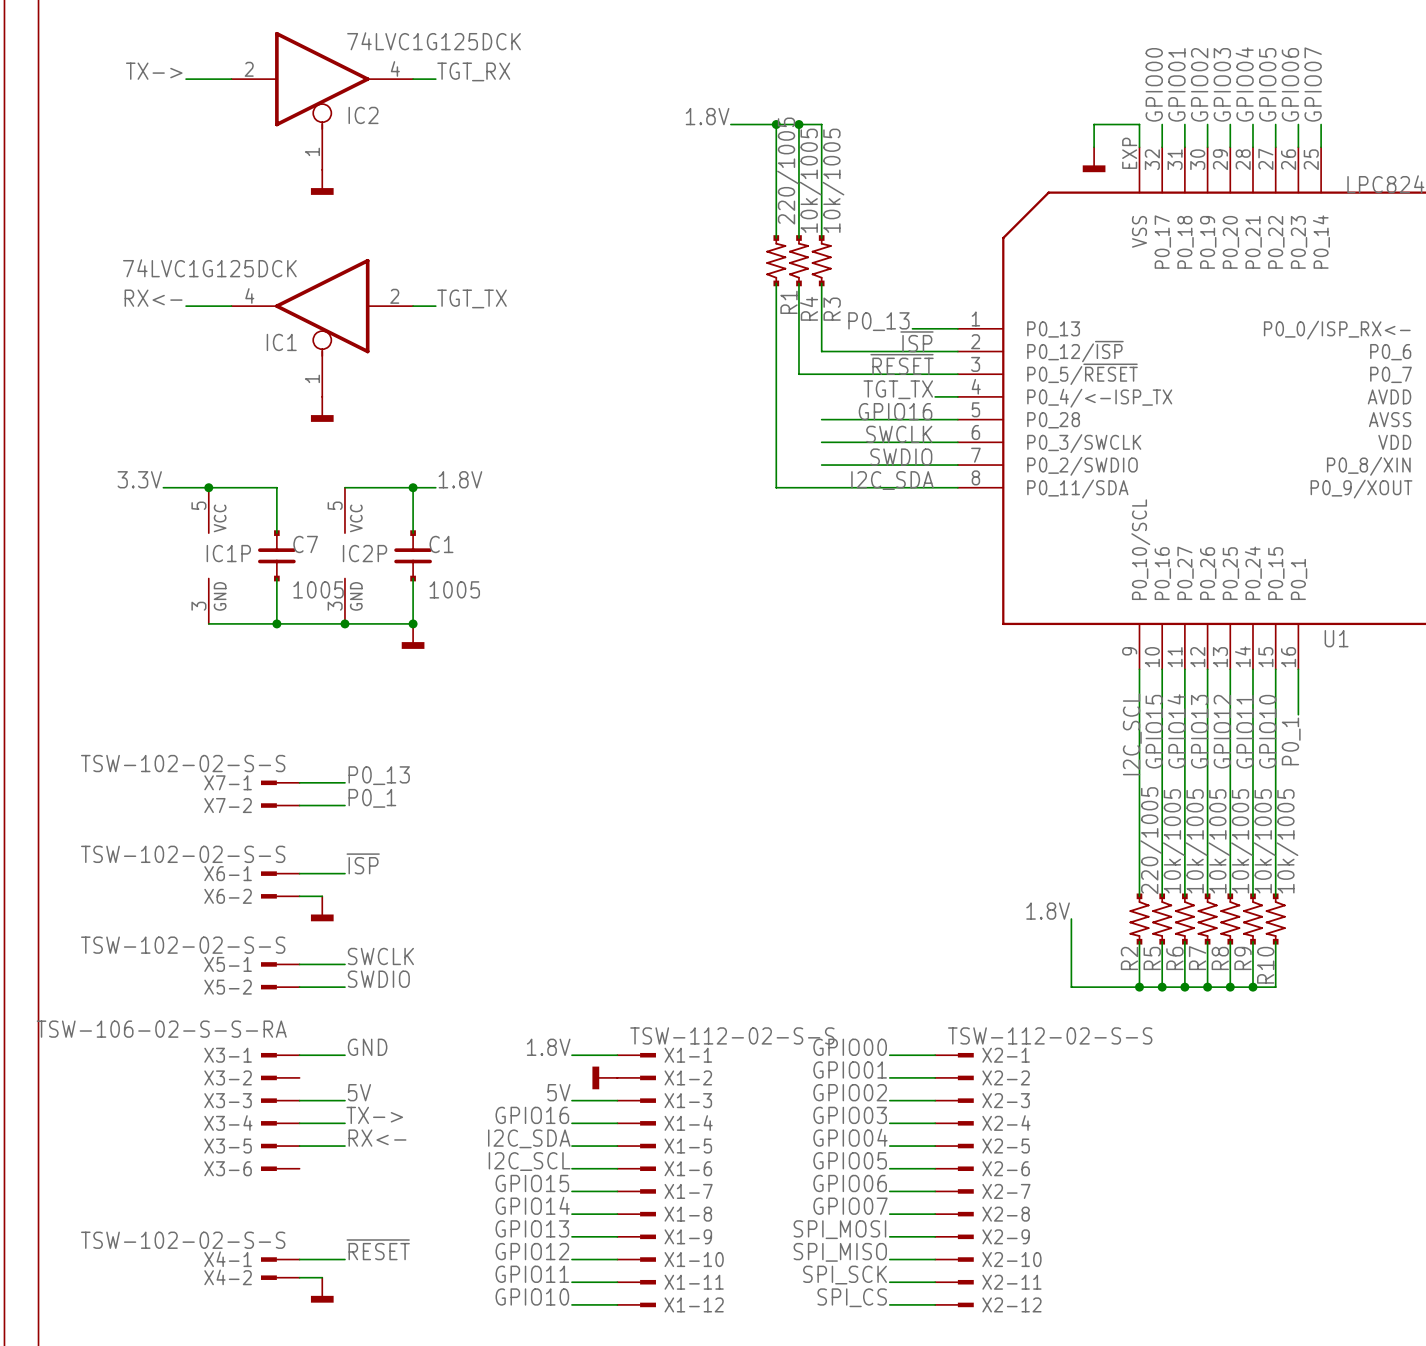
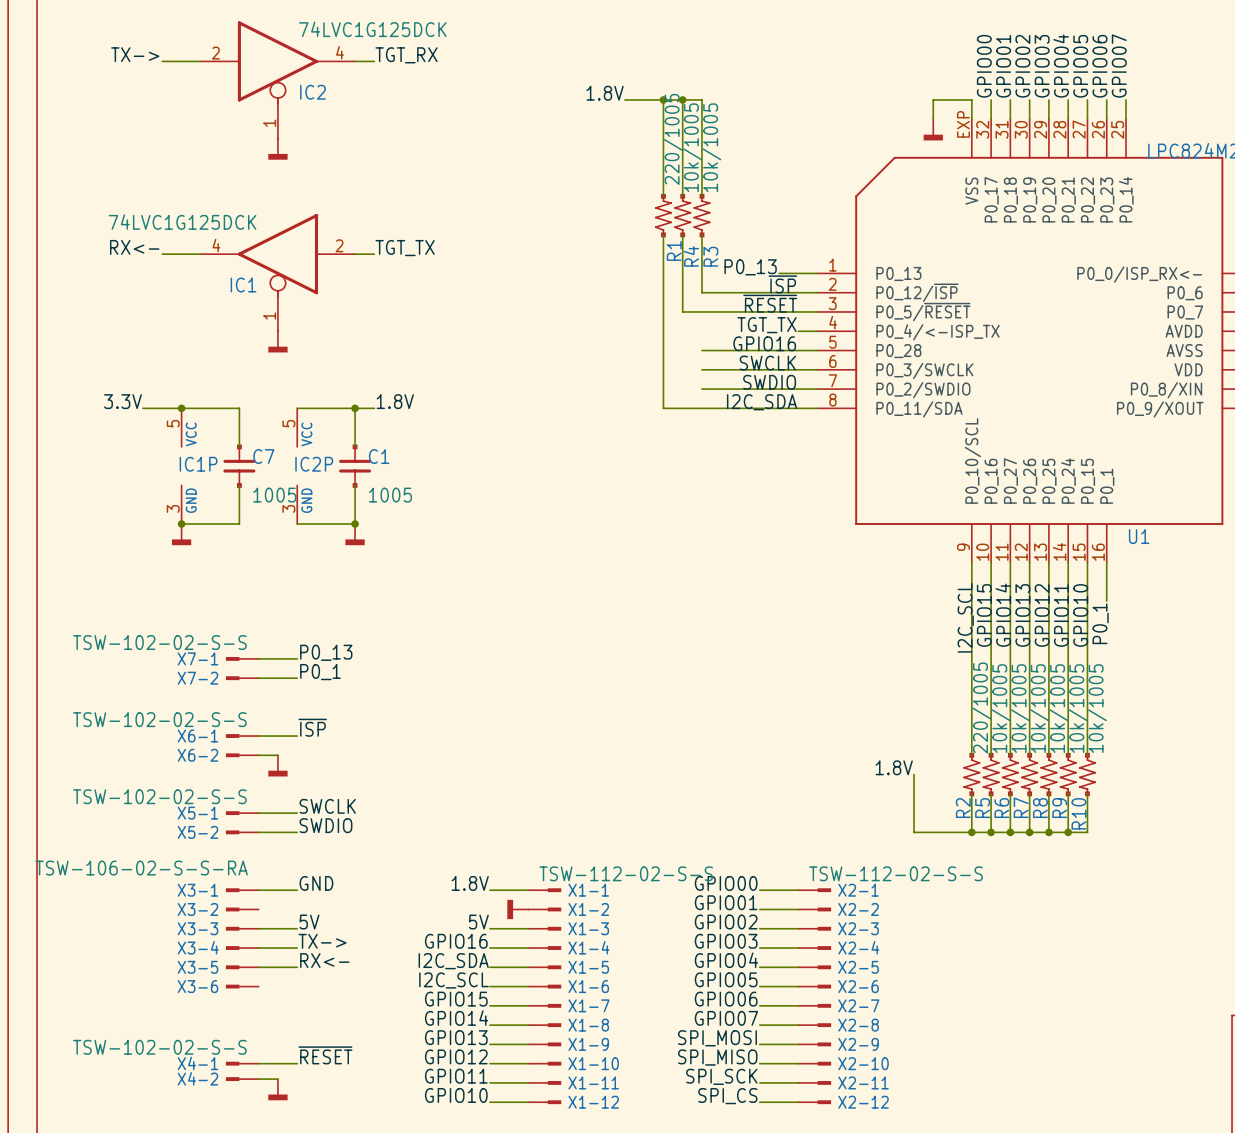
junction: none -> (181, 524)
wire: (276, 623) (344, 623) -> none
junction: (276, 623) -> none
junction: (344, 623) -> none
power symbol: none -> (181, 534)

